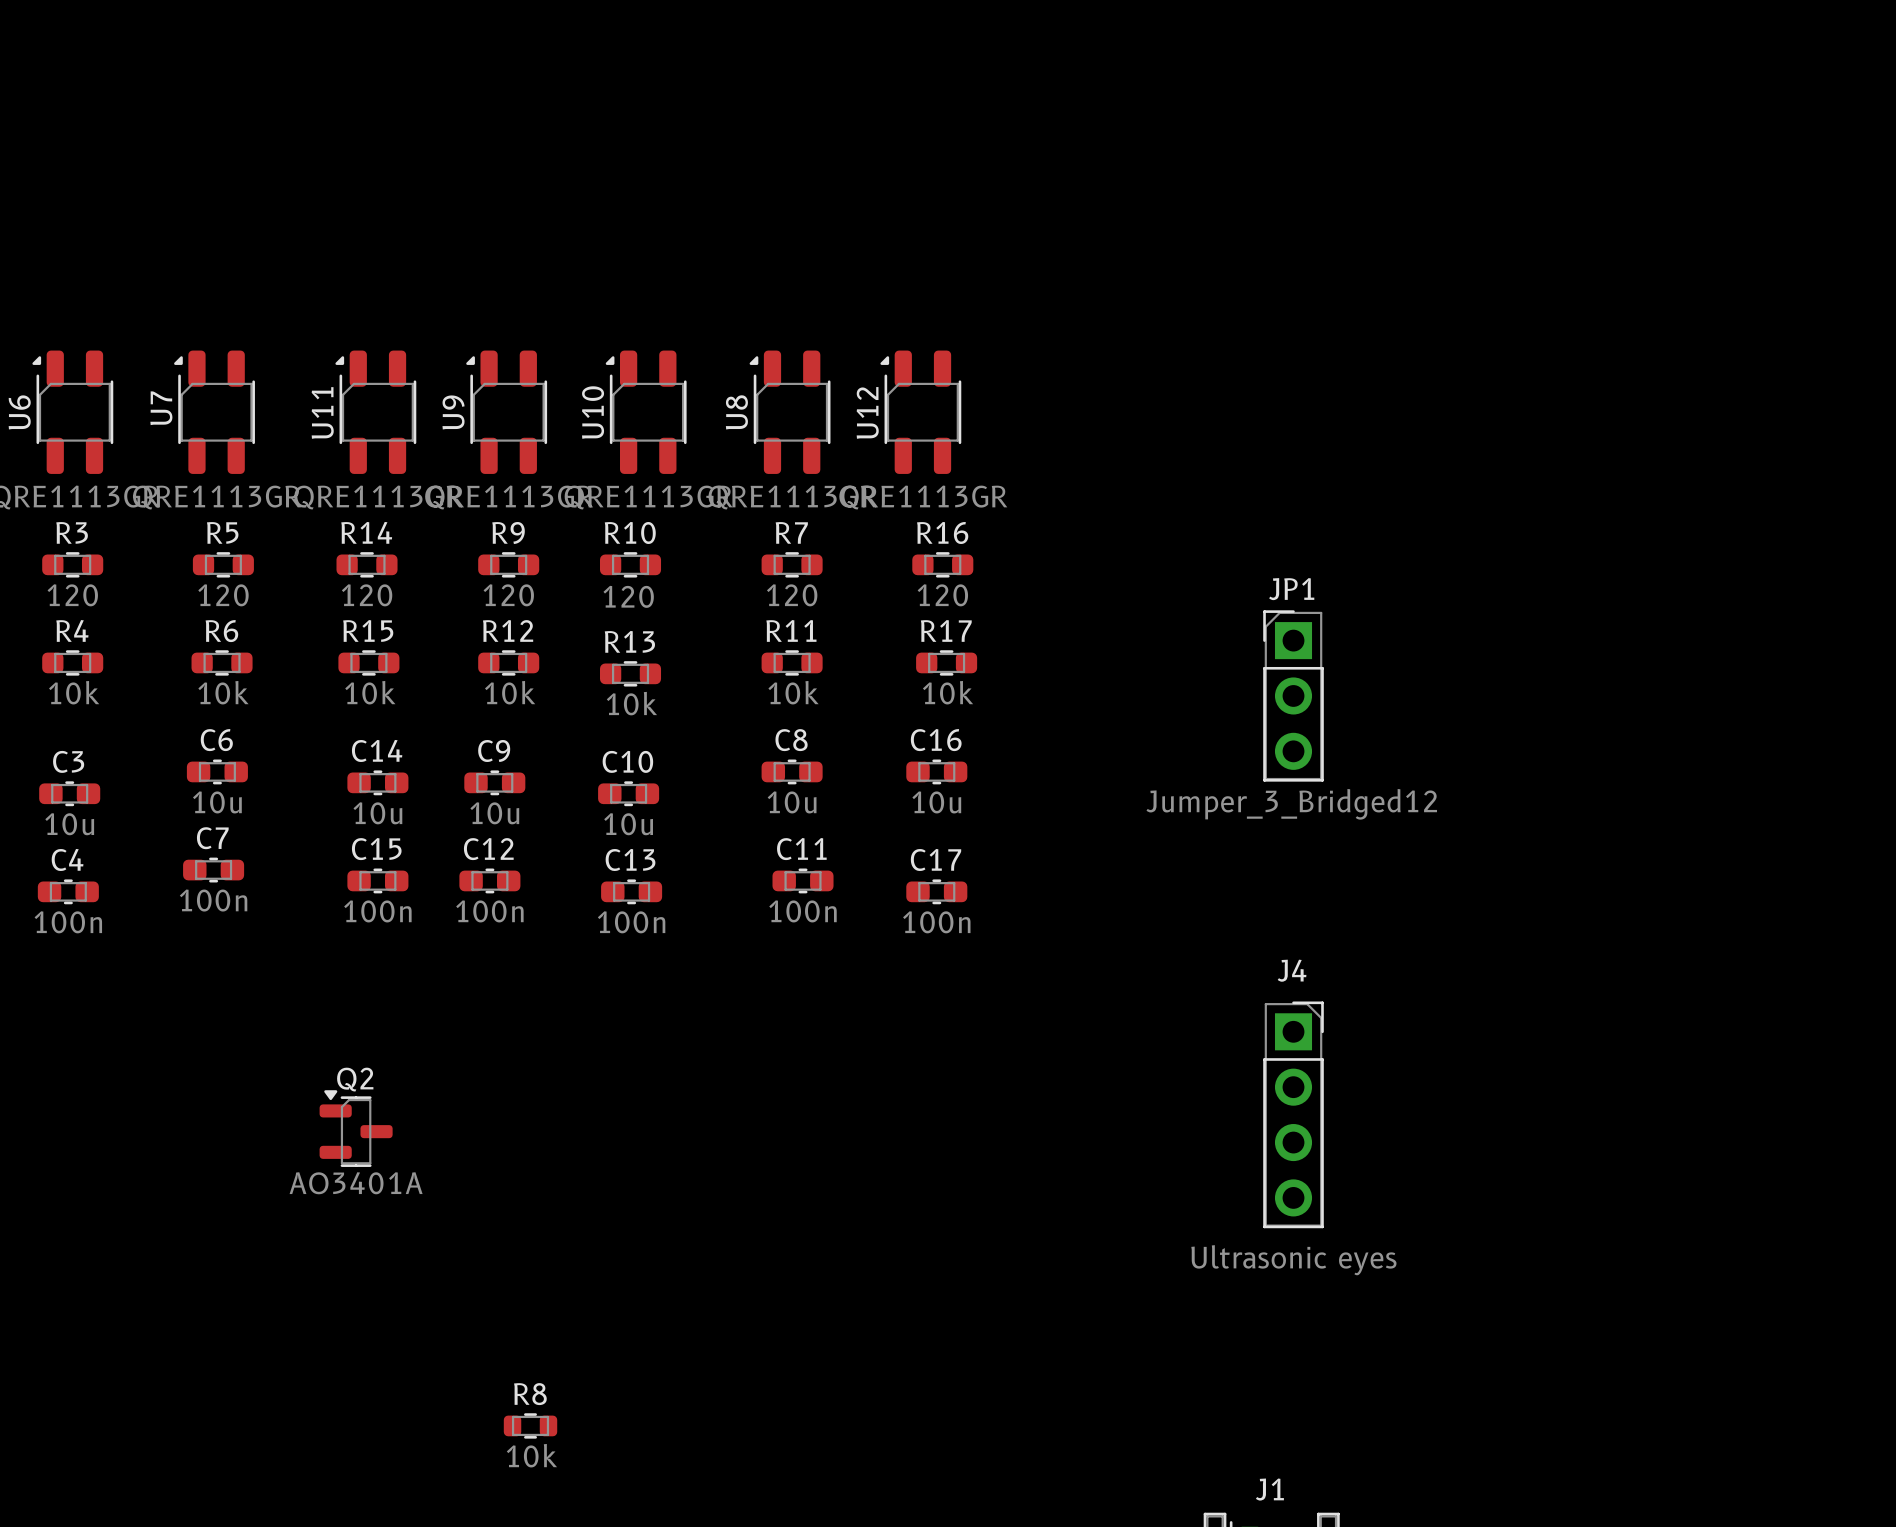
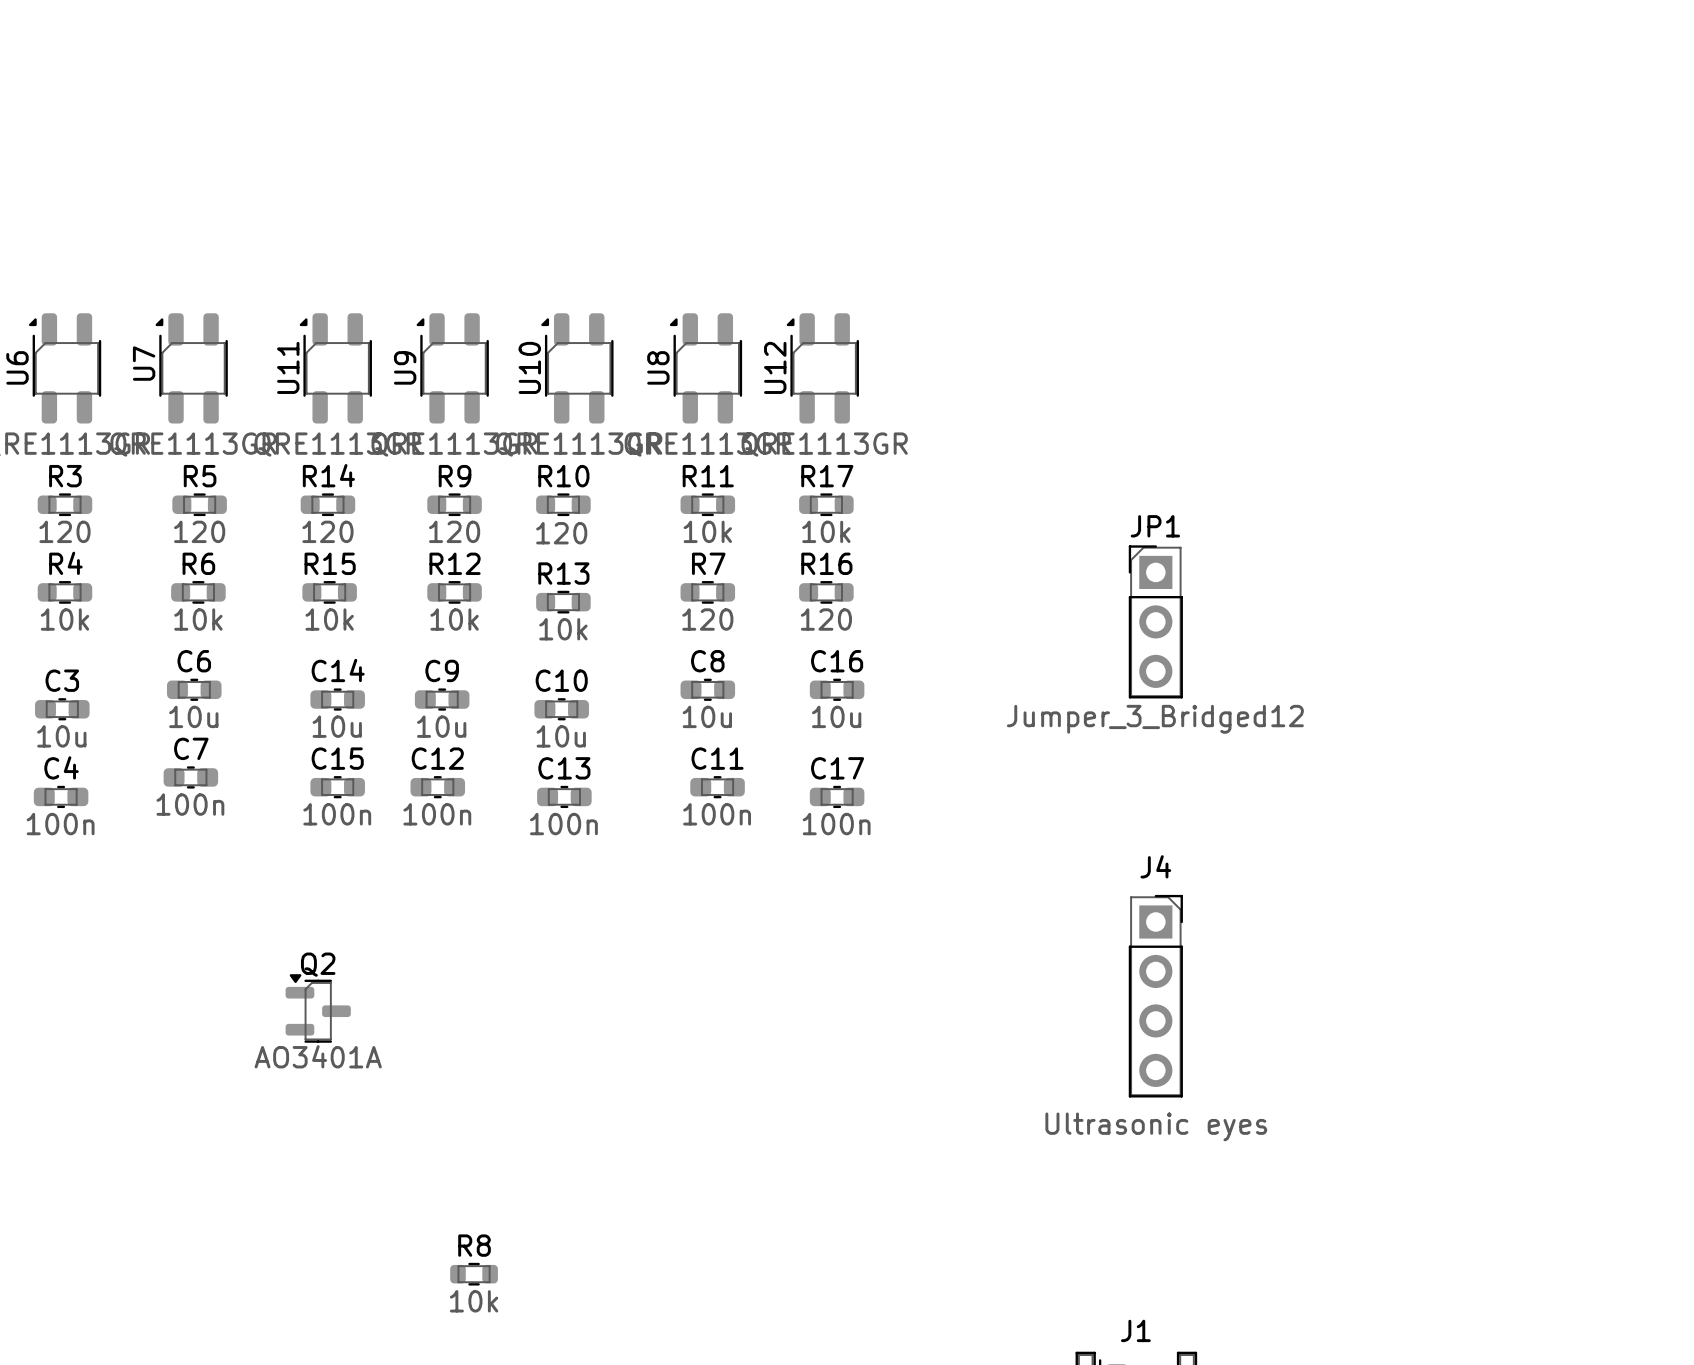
R7 name: R7 (791, 532) -> R11 (708, 476)
R16 position: (942, 564) -> (826, 592)
R7 value: 120 (792, 595) -> 10k (707, 531)
R11 name: R11 (791, 630) -> R7 (708, 563)
R17 position: (946, 662) -> (826, 504)
R11 value: 10k (793, 692) -> 120 (707, 619)

